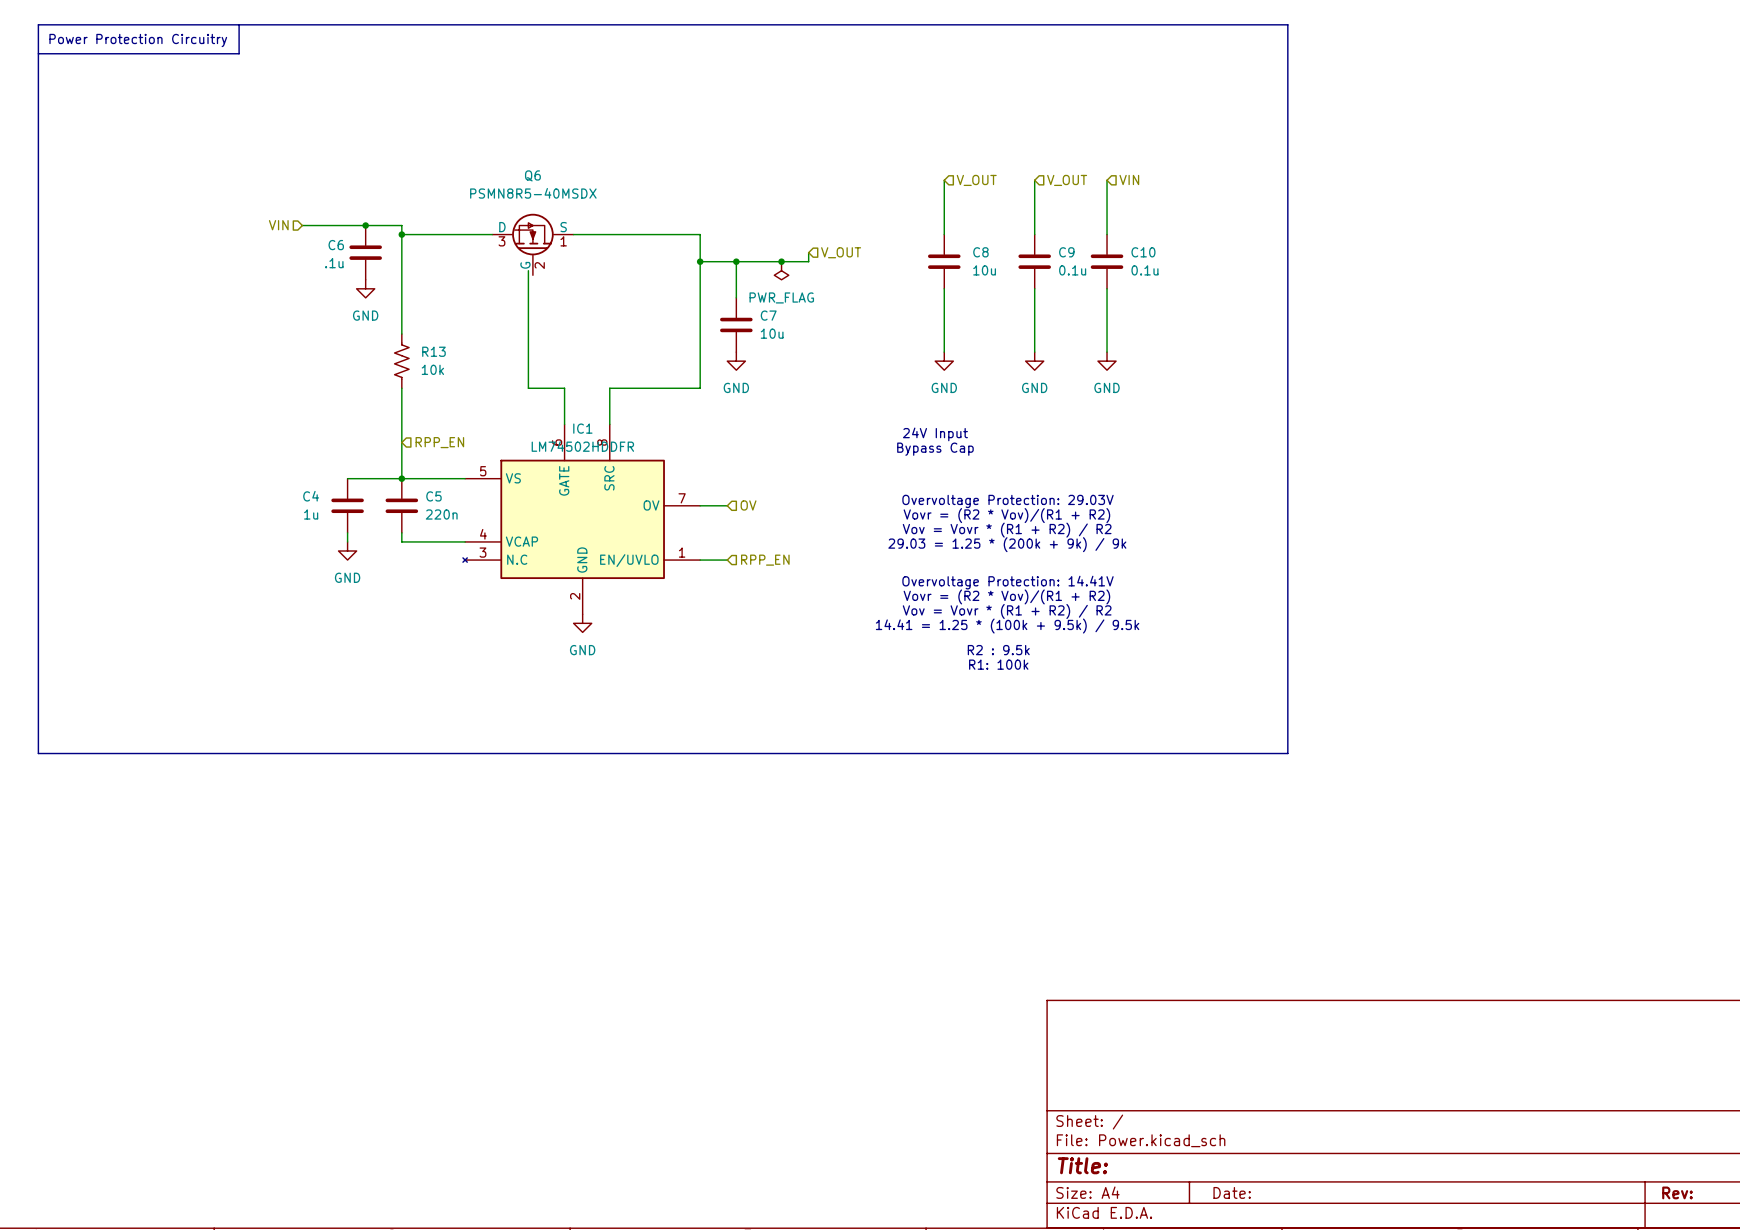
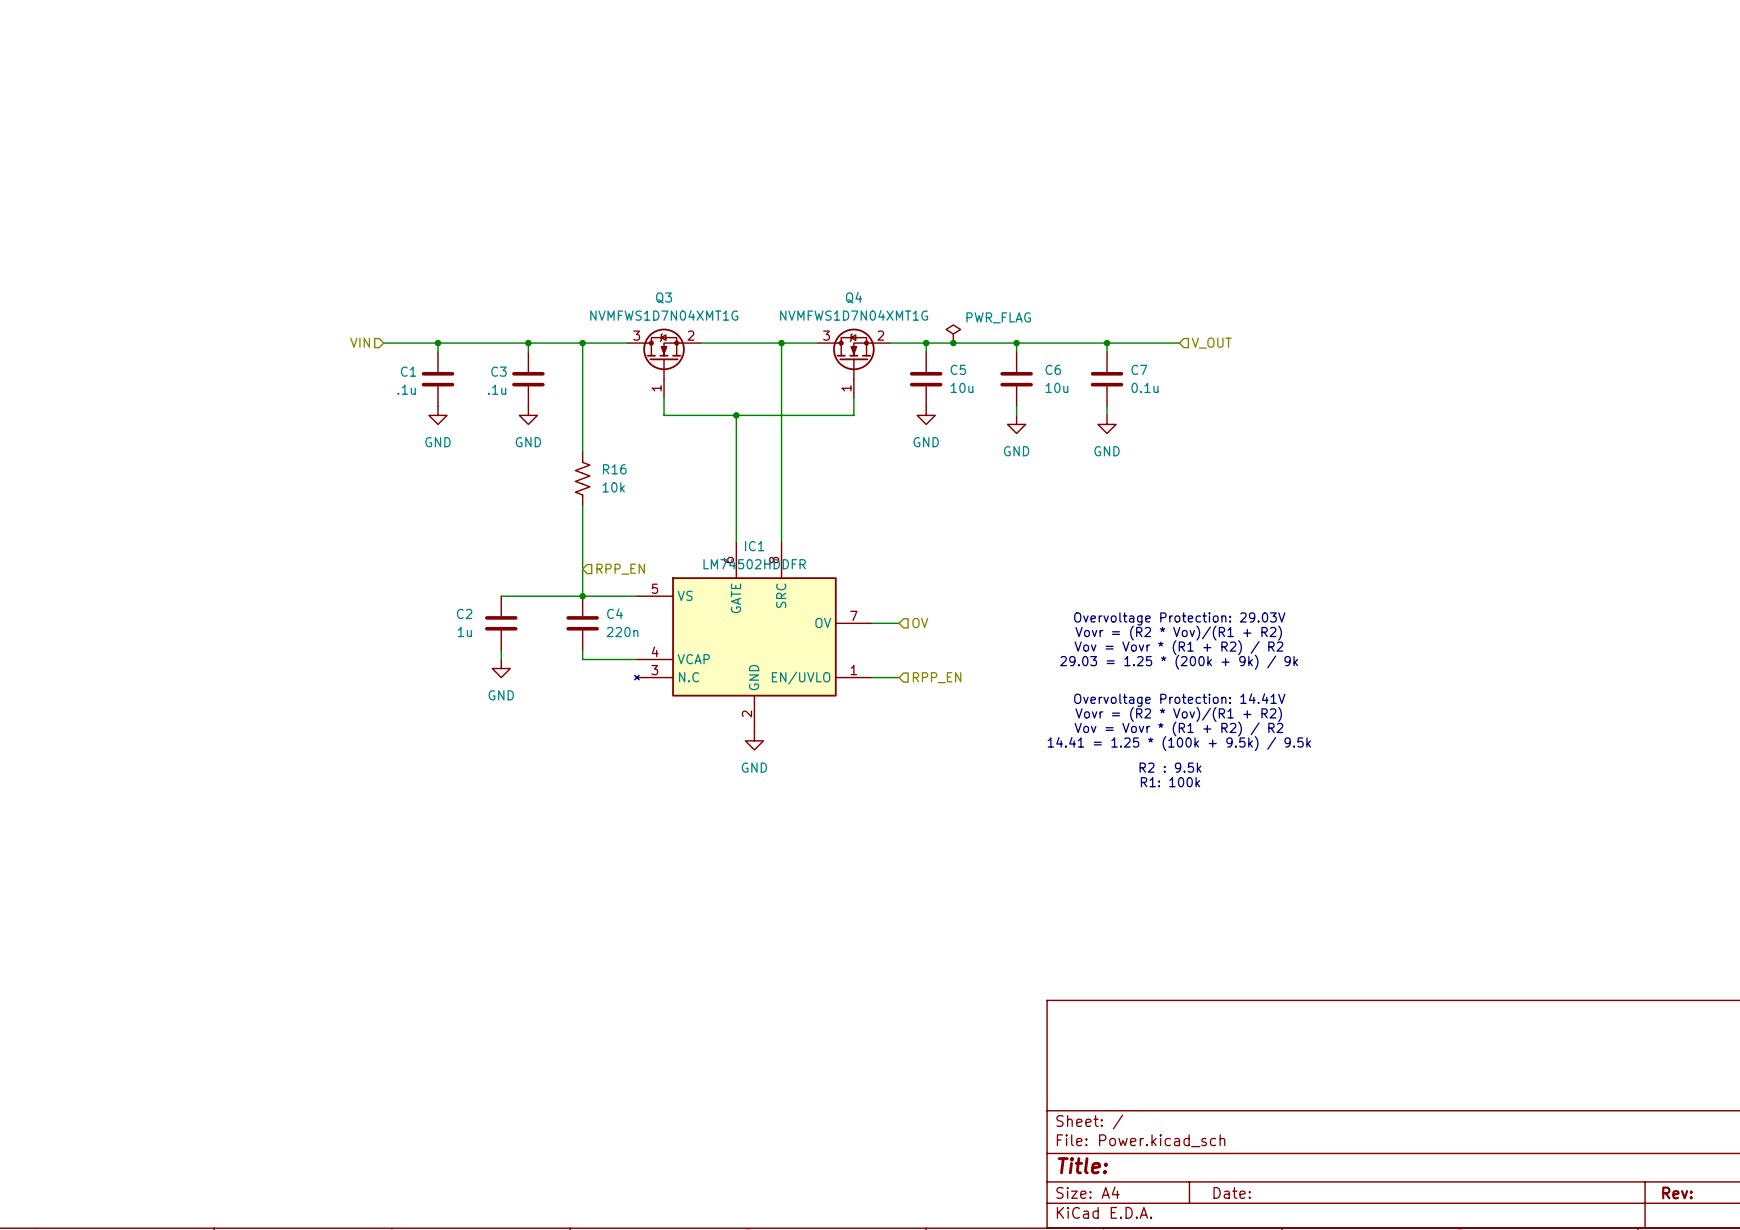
line: (38, 24) (1287, 24) (1287, 753) (38, 753) (38, 24) -> none
line: (239, 24) (239, 53) (38, 53) -> none
text: Power Protection Circuitry (138, 40) -> none
hierarchical label: VIN (1129, 179) -> none
wire: (944, 180) (944, 234) -> none
hierarchical label: V_OUT (976, 180) -> none
wire: (1034, 180) (1034, 234) -> none
hierarchical label: V_OUT (1067, 180) -> none
wire: (1107, 180) (1107, 234) -> none
hierarchical label position: VIN (278, 225) -> VIN (360, 342)
wire: (302, 225) (401, 225) (401, 334) -> none
junction: (365, 225) -> none
wire: (401, 234) (492, 234) -> none
junction: (401, 234) -> none
wire: (573, 234) (700, 234) (700, 388) (609, 388) (609, 424) -> none
Q6: PSMN8R5-40MSDX (532, 244) -> none
C6 name position: C6 (336, 245) -> C6 (1053, 369)
C6 position: (365, 252) -> (1016, 379)
wire: (808, 252) (808, 261) (700, 261) -> none
hierarchical label: V_OUT (841, 252) -> none
junction: (700, 261) -> none
wire: (736, 261) (736, 297) -> none
junction: (736, 261) -> none
junction: (781, 261) -> none
C8: 10u (944, 261) -> none
C9: 0.1u (1034, 261) -> none
C10: 0.1u (1107, 261) -> none
C6 value: .1u (334, 263) -> 10u (1056, 387)
wire: (528, 270) (528, 343) -> none
power symbol: PWR_FLAG (781, 270) -> none
power symbol: GND (365, 288) -> none
wire: (944, 288) (944, 352) -> none
wire: (1034, 288) (1034, 352) -> none
wire: (1107, 288) (1107, 343) -> none
C7 position: (736, 324) -> (1107, 379)
C7 value: 10u (772, 333) -> 0.1u (1144, 387)
power symbol: none -> PWR_FLAG (953, 334)
wire: none -> (383, 343) (627, 343)
wire: none -> (437, 343) (437, 352)
junction: none -> (437, 343)
junction: none -> (528, 343)
wire: none -> (582, 343) (582, 451)
junction: none -> (582, 343)
wire: none -> (700, 343) (817, 343)
wire: none -> (781, 343) (781, 541)
junction: none -> (781, 343)
wire: none -> (890, 343) (1179, 343)
wire: none -> (926, 343) (926, 352)
junction: none -> (926, 343)
junction: none -> (953, 343)
wire: none -> (1016, 343) (1016, 352)
junction: none -> (1016, 343)
junction: none -> (1107, 343)
hierarchical label: none -> V_OUT (1211, 343)
wire: (528, 352) (528, 388) (564, 388) (564, 424) -> none
R13: 10k (401, 361) -> none
power symbol: GND (736, 361) -> none
power symbol: GND (944, 361) -> none
power symbol: GND (1034, 361) -> none
power symbol: GND (1107, 361) -> none
Q3: none -> NVMFWS1D7N04XMT1G (664, 362)
Q4: none -> NVMFWS1D7N04XMT1G (853, 362)
C1: none -> .1u (437, 379)
C3: none -> .1u (528, 379)
wire: (401, 388) (401, 478) -> none
wire: none -> (664, 397) (664, 415) (853, 415) (853, 397)
wire: none -> (1016, 406) (1016, 415)
wire: none -> (1107, 406) (1107, 415)
power symbol: none -> GND (437, 415)
power symbol: none -> GND (528, 415)
wire: none -> (736, 415) (736, 541)
junction: none -> (736, 415)
power symbol: none -> GND (926, 415)
power symbol: none -> GND (1016, 424)
power symbol: none -> GND (1107, 424)
text: 24V Input (935, 434) -> none
hierarchical label: RPP_EN (439, 442) -> none
text: Bypass Cap (935, 449) -> none
wire: (347, 478) (465, 478) -> none
junction: (401, 478) -> none
R16: none -> 10k (582, 478)
C4 name position: C4 (311, 496) -> C4 (615, 613)
text: Overvoltage Protection: 29.03V (1007, 501) -> none
C4 position: (347, 505) -> (582, 623)
C5 position: (401, 505) -> (926, 379)
wire: (700, 505) (727, 505) -> none
hierarchical label: OV (748, 505) -> none
C4 value: 1u (311, 514) -> 220n (622, 632)
C5 value: 220n (441, 514) -> 10u (962, 387)
text: Vovr = (R2 * Vov)/(R1 + R2) (1006, 515) -> none
IC1 position: (581, 519) -> (753, 636)
text: Vov = Vovr * (R1 + R2) / R2 (1007, 530) -> none
wire: (347, 532) (347, 541) -> none
wire: (401, 532) (401, 541) (465, 541) -> none
text: 29.03 = 1.25 * (200k + 9k) / 9k (1007, 544) -> none
power symbol: GND (347, 551) -> none
wire: (700, 560) (727, 560) -> none
hierarchical label: RPP_EN (765, 560) -> none
hierarchical label: none -> RPP_EN (620, 569)
text: Overvoltage Protection: 14.41V (1007, 582) -> none
wire: none -> (501, 596) (636, 596)
junction: none -> (582, 596)
text: Vovr = (R2 * Vov)/(R1 + R2) (1006, 596) -> none
text: Vov = Vovr * (R1 + R2) / R2 (1007, 611) -> none
text: none -> Overvoltage Protection: 29.03V (1179, 618)
hierarchical label: none -> OV (920, 622)
C2: none -> 1u (501, 623)
power symbol position: GND (582, 623) -> GND (501, 668)
wire: none -> (871, 623) (899, 623)
text: 14.41 = 1.25 * (100k + 9.5k) / 9.5k (1007, 626) -> none
text: none -> Vovr = (R2 * Vov)/(R1 + R2) (1178, 633)
text: none -> Vov = Vovr * (R1 + R2) / R2 (1178, 647)
wire: none -> (501, 650) (501, 659)
wire: none -> (582, 650) (582, 659) (636, 659)
text: R2 : 9.5k (998, 650) -> none
text: none -> 29.03 = 1.25 * (200k + 9k) / 9k (1179, 662)
text: R1: 100k (998, 664) -> none
wire: none -> (871, 677) (899, 677)
hierarchical label: none -> RPP_EN (937, 677)
text: none -> Overvoltage Protection: 14.41V (1179, 700)
text: none -> Vovr = (R2 * Vov)/(R1 + R2) (1178, 714)
text: none -> Vov = Vovr * (R1 + R2) / R2 (1178, 729)
power symbol: none -> GND (754, 740)
text: none -> 14.41 = 1.25 * (100k + 9.5k) / 9.5k (1179, 743)
text: none -> R2 : 9.5k (1170, 767)
text: none -> R1: 100k (1170, 782)

